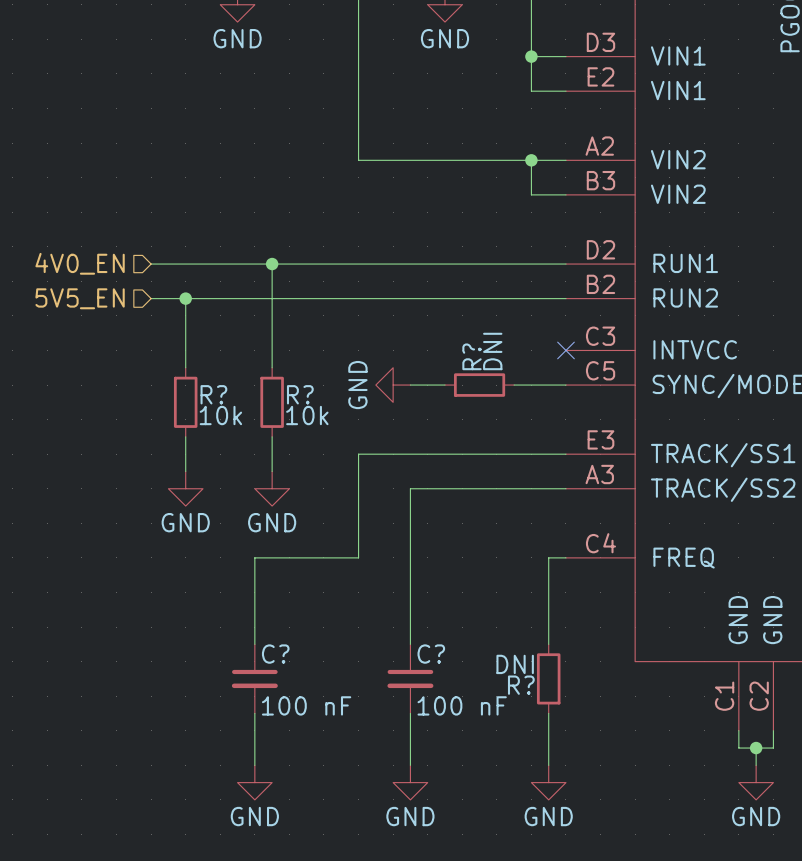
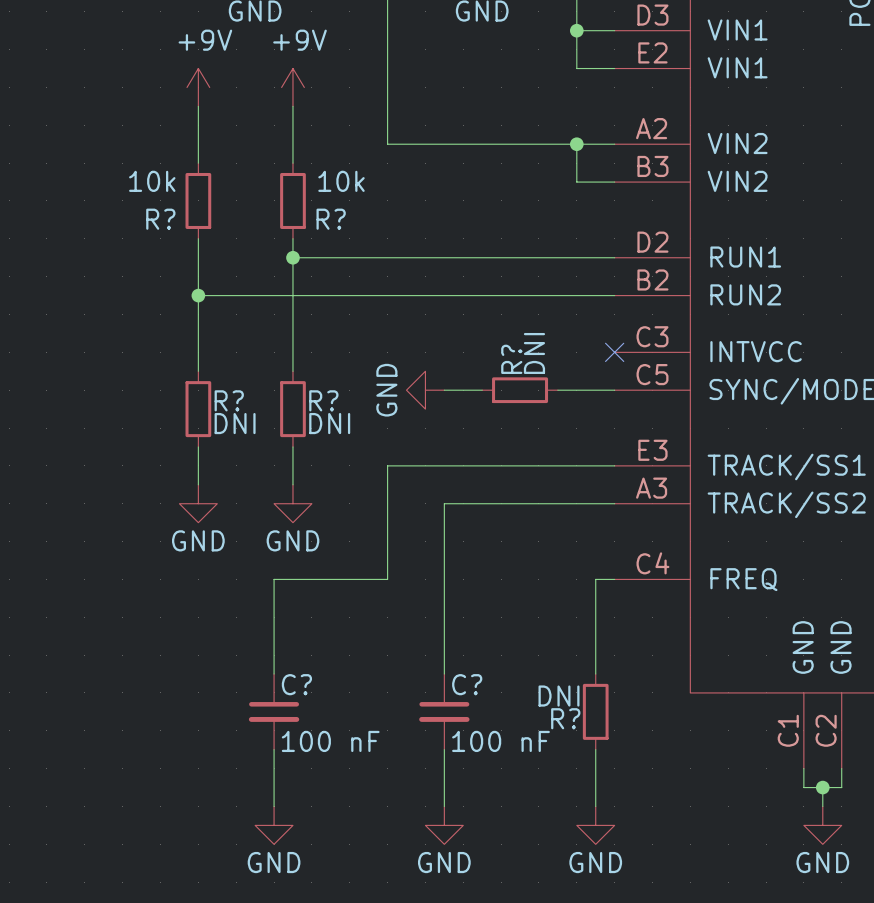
power symbol: none -> +9V (198, 87)
power symbol: none -> +9V (292, 87)
wire: none -> (198, 106) (198, 163)
wire: none -> (292, 106) (292, 163)
R?: none -> 10k (198, 200)
R?: none -> 10k (292, 200)
hierarchical label: 4V0_EN (80, 263) -> none
wire: (151, 264) (272, 264) -> (292, 238) (292, 257)
hierarchical label: 5V5_EN (80, 298) -> none
wire: (151, 298) (185, 298) -> (198, 238) (198, 295)
R? value: 10k (220, 415) -> DNI (235, 423)
R? value: 10k (307, 415) -> DNI (329, 423)

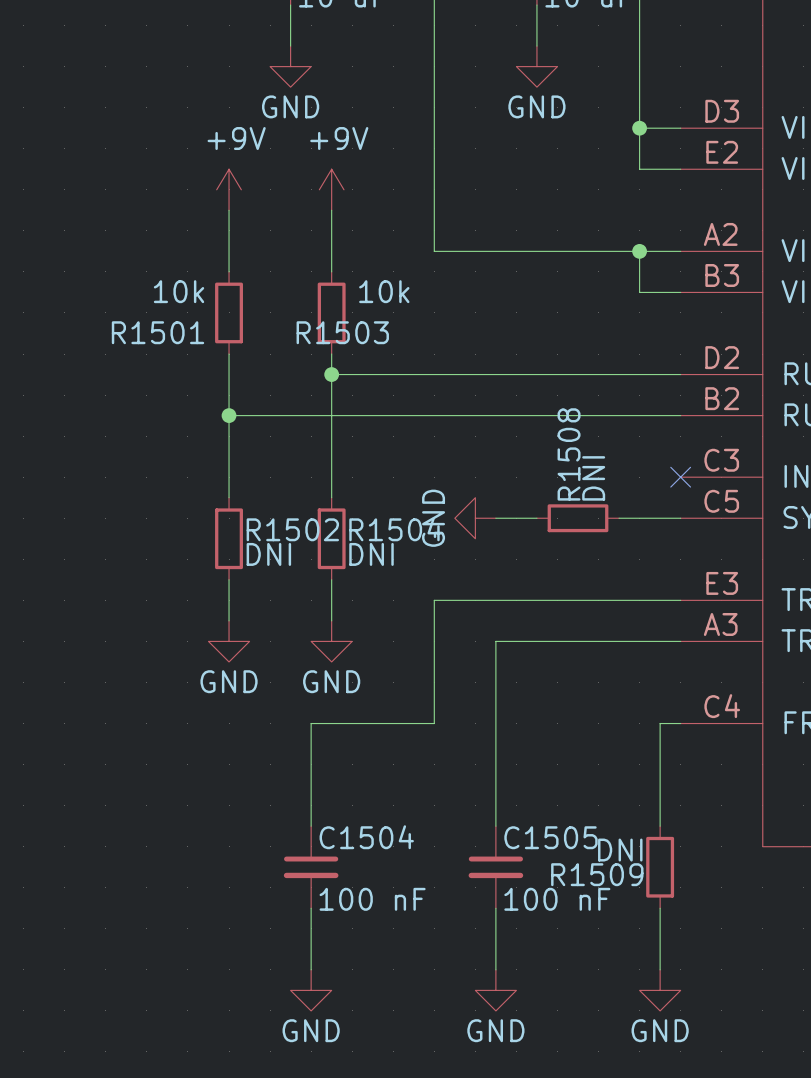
R? name: R? (160, 219) -> R1501 (157, 332)
R? name: R? (331, 219) -> R1503 (342, 332)
R? name: R? (511, 359) -> R1508 (569, 454)
R? name: R? (229, 400) -> R1502 (292, 529)
R? name: R? (323, 400) -> R1504 (395, 529)
C? name: C? (296, 684) -> C1504 (366, 837)
C? name: C? (467, 684) -> C1505 (550, 837)
R? name: R? (565, 718) -> R1509 (597, 874)

